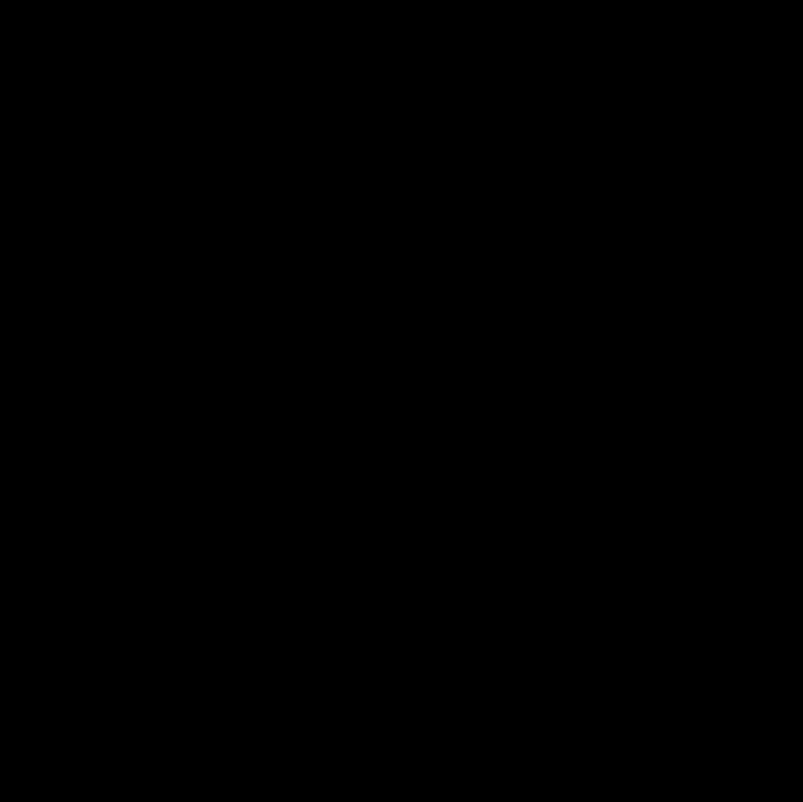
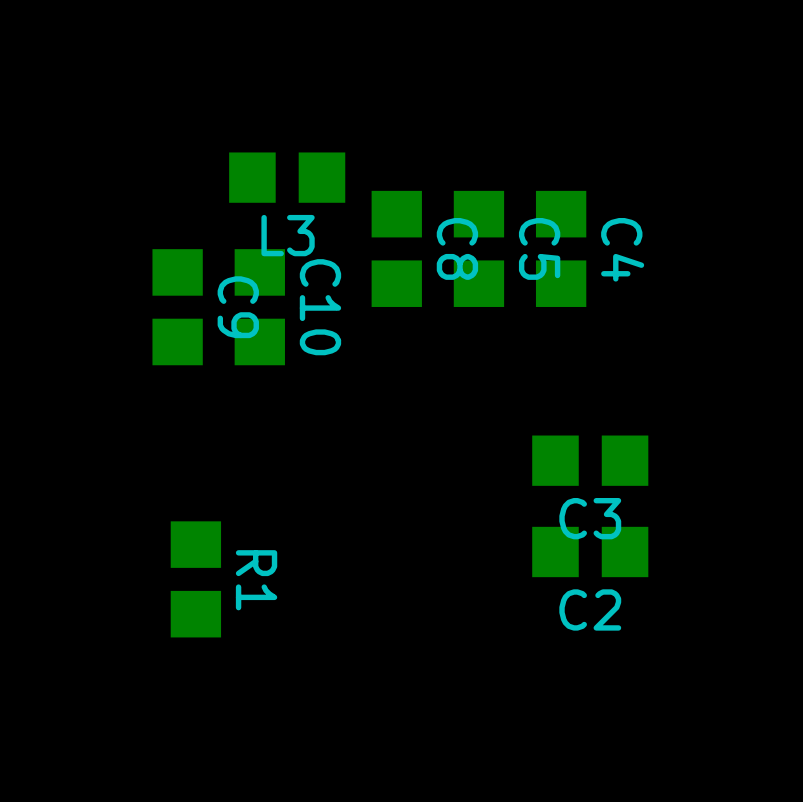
L3: none -> (287, 177)
C8: none -> (396, 248)
C5: none -> (478, 248)
C4: none -> (561, 248)
C9: none -> (177, 307)
C10: none -> (259, 307)
C3: none -> (590, 460)
C2: none -> (590, 551)
R1: none -> (195, 579)

